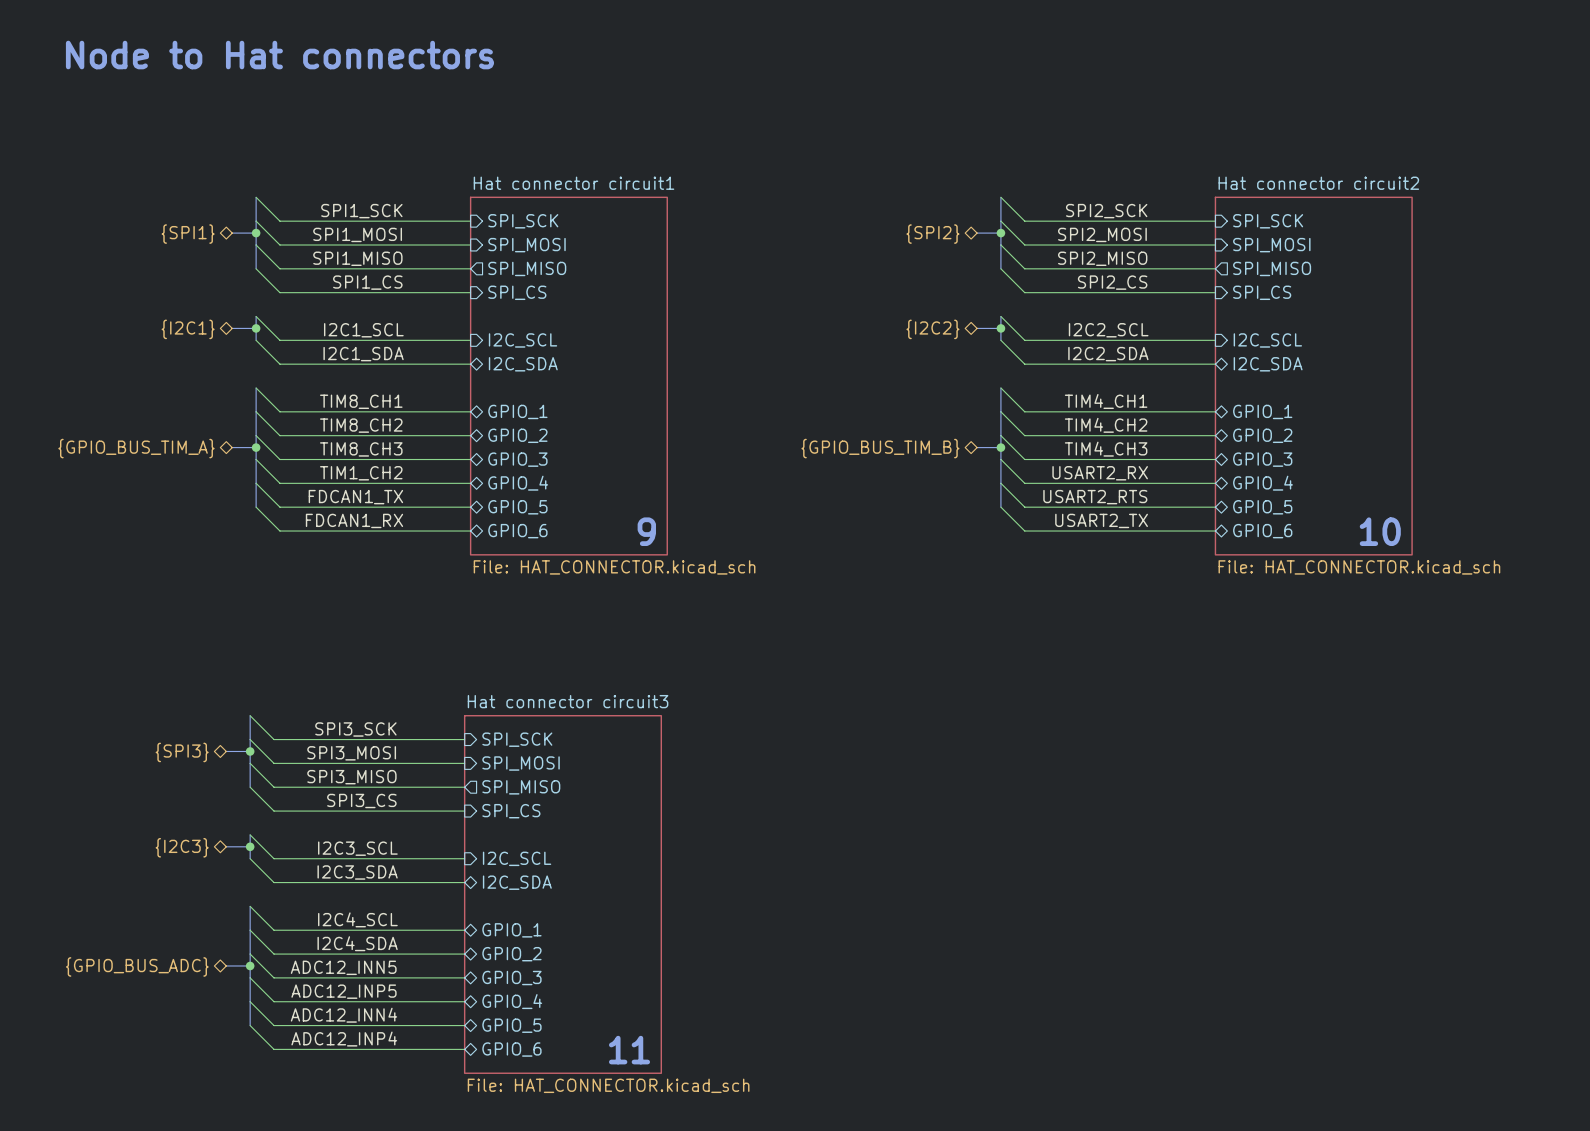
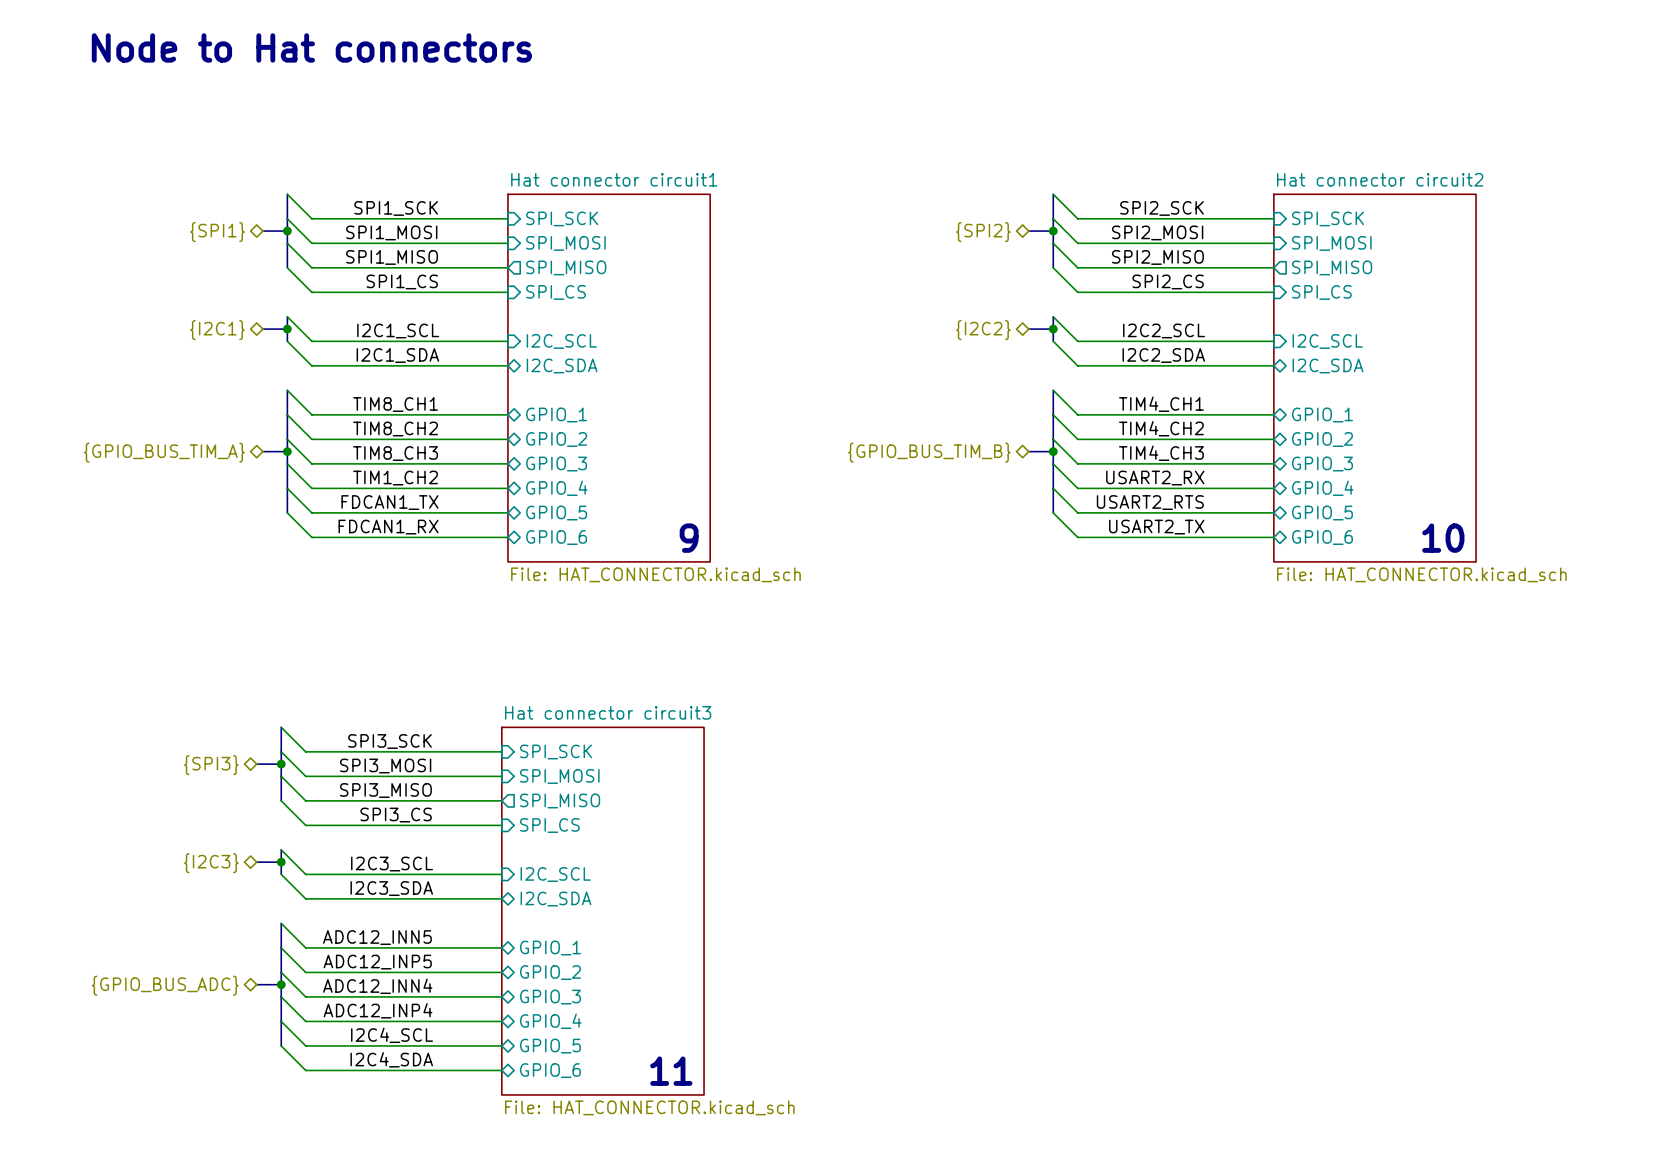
label: I2C4_SCL (357, 919) -> ADC12_INN5 (377, 937)
label: I2C4_SDA (357, 943) -> ADC12_INP5 (377, 962)
label: ADC12_INN5 (343, 967) -> ADC12_INN4 (377, 986)
label: ADC12_INP5 (343, 991) -> ADC12_INP4 (378, 1010)
label: ADC12_INN4 (343, 1015) -> I2C4_SCL (392, 1035)
label: ADC12_INP4 (344, 1039) -> I2C4_SDA (391, 1059)

